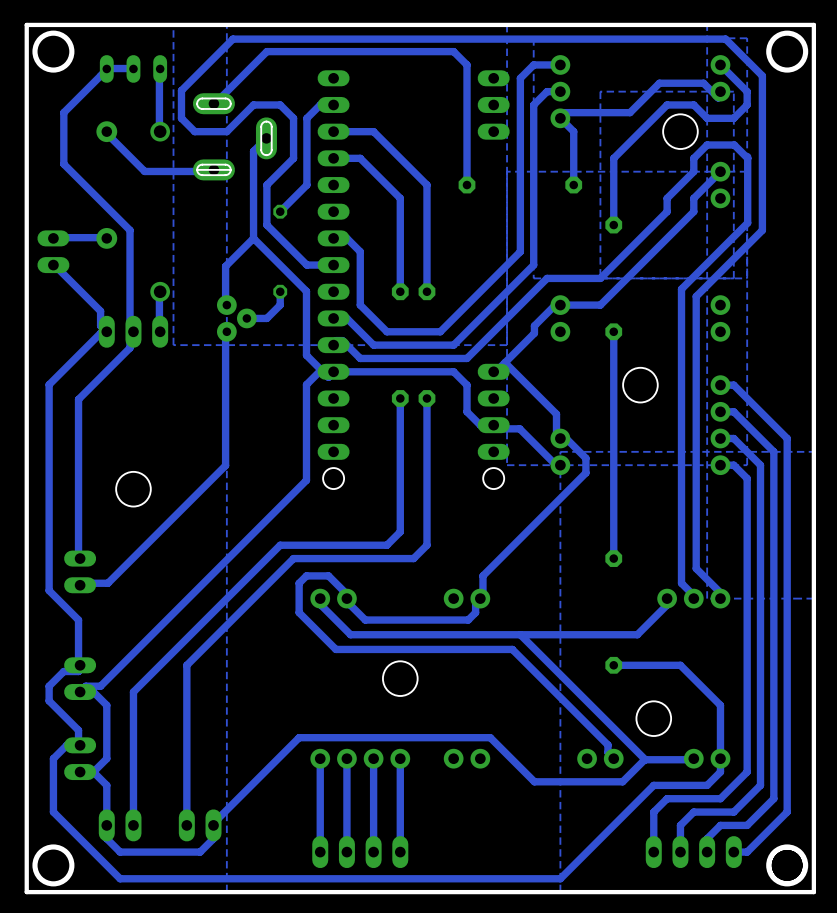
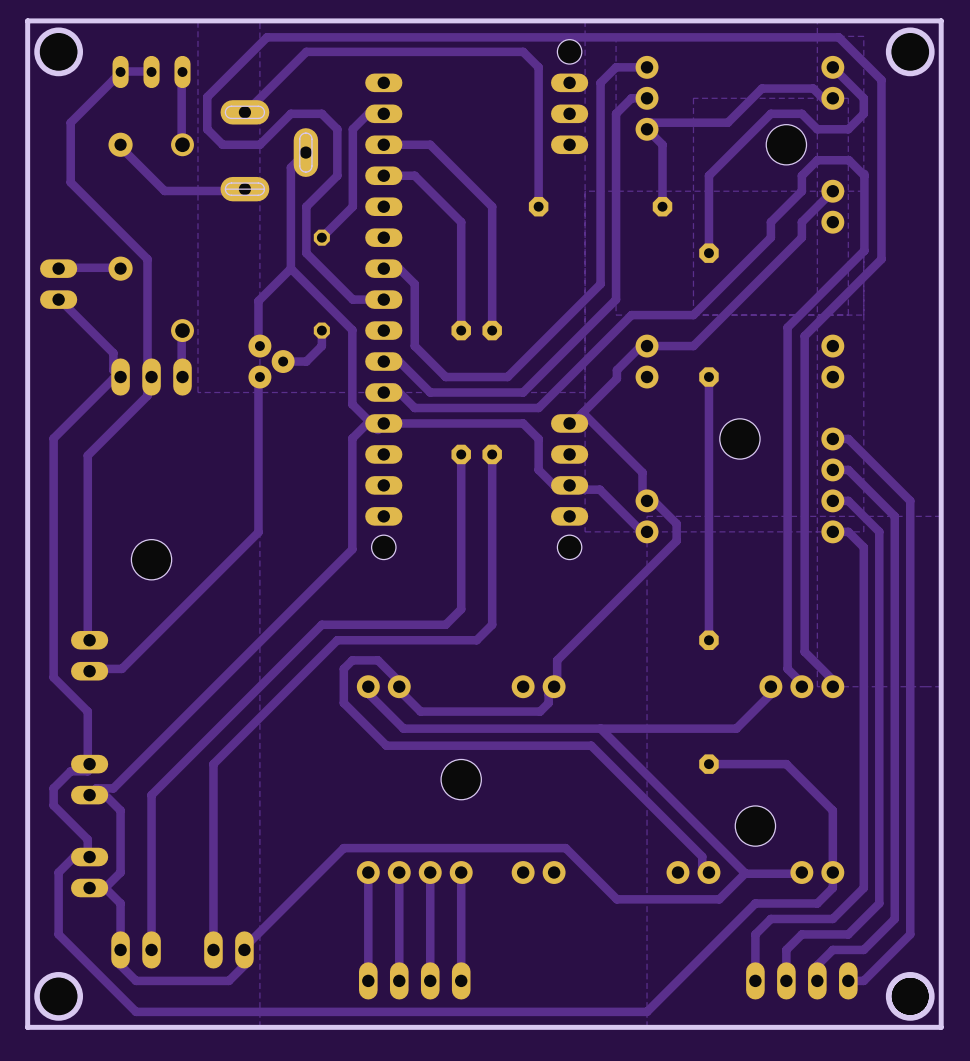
hole: none -> (569, 51)

